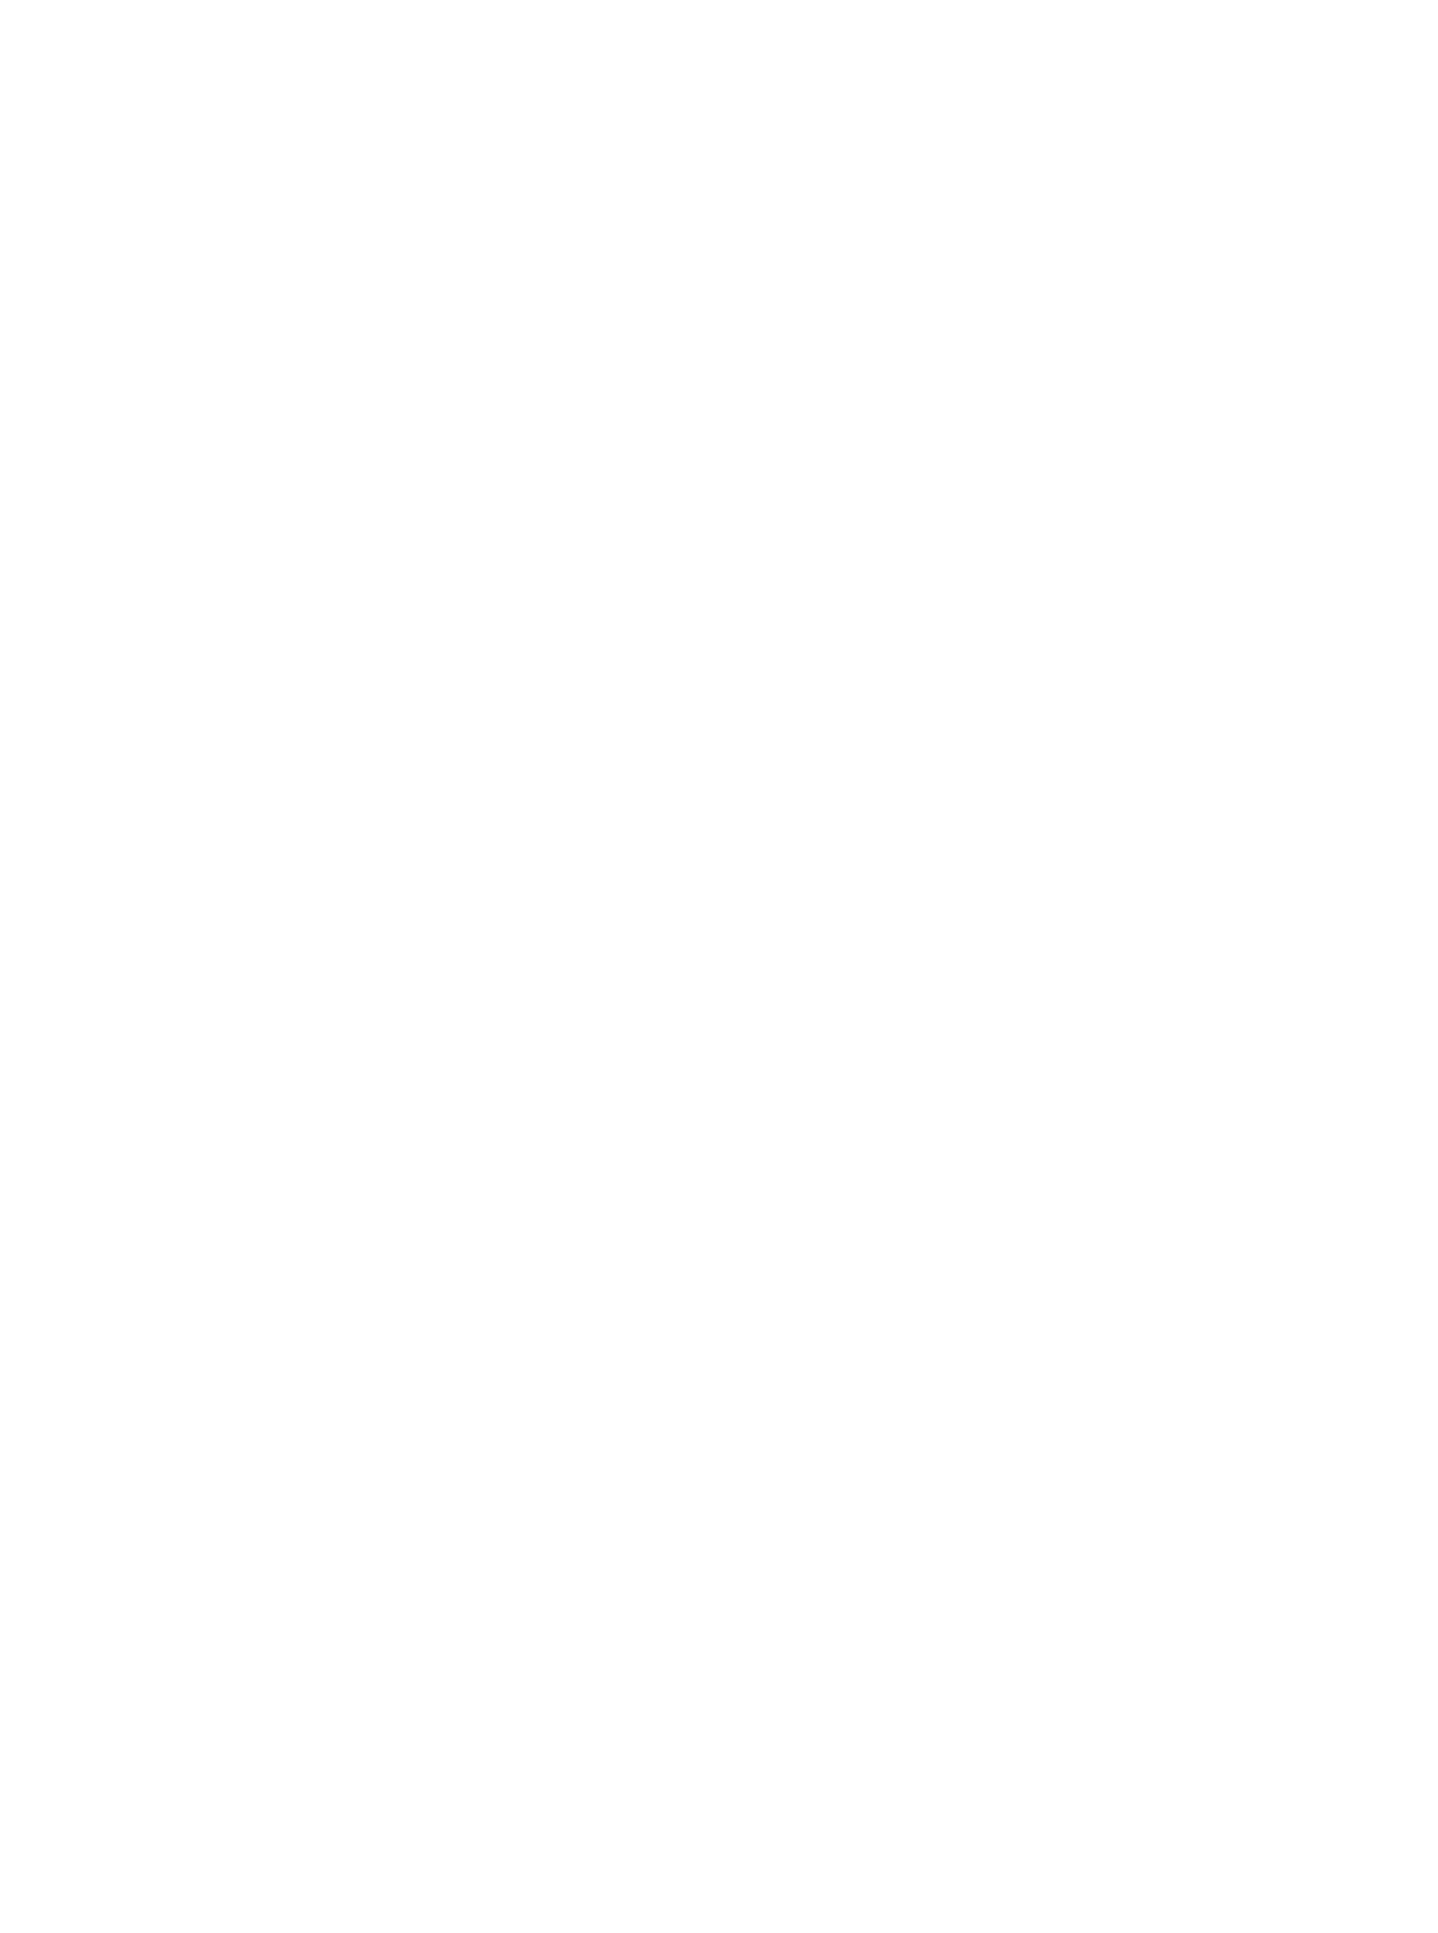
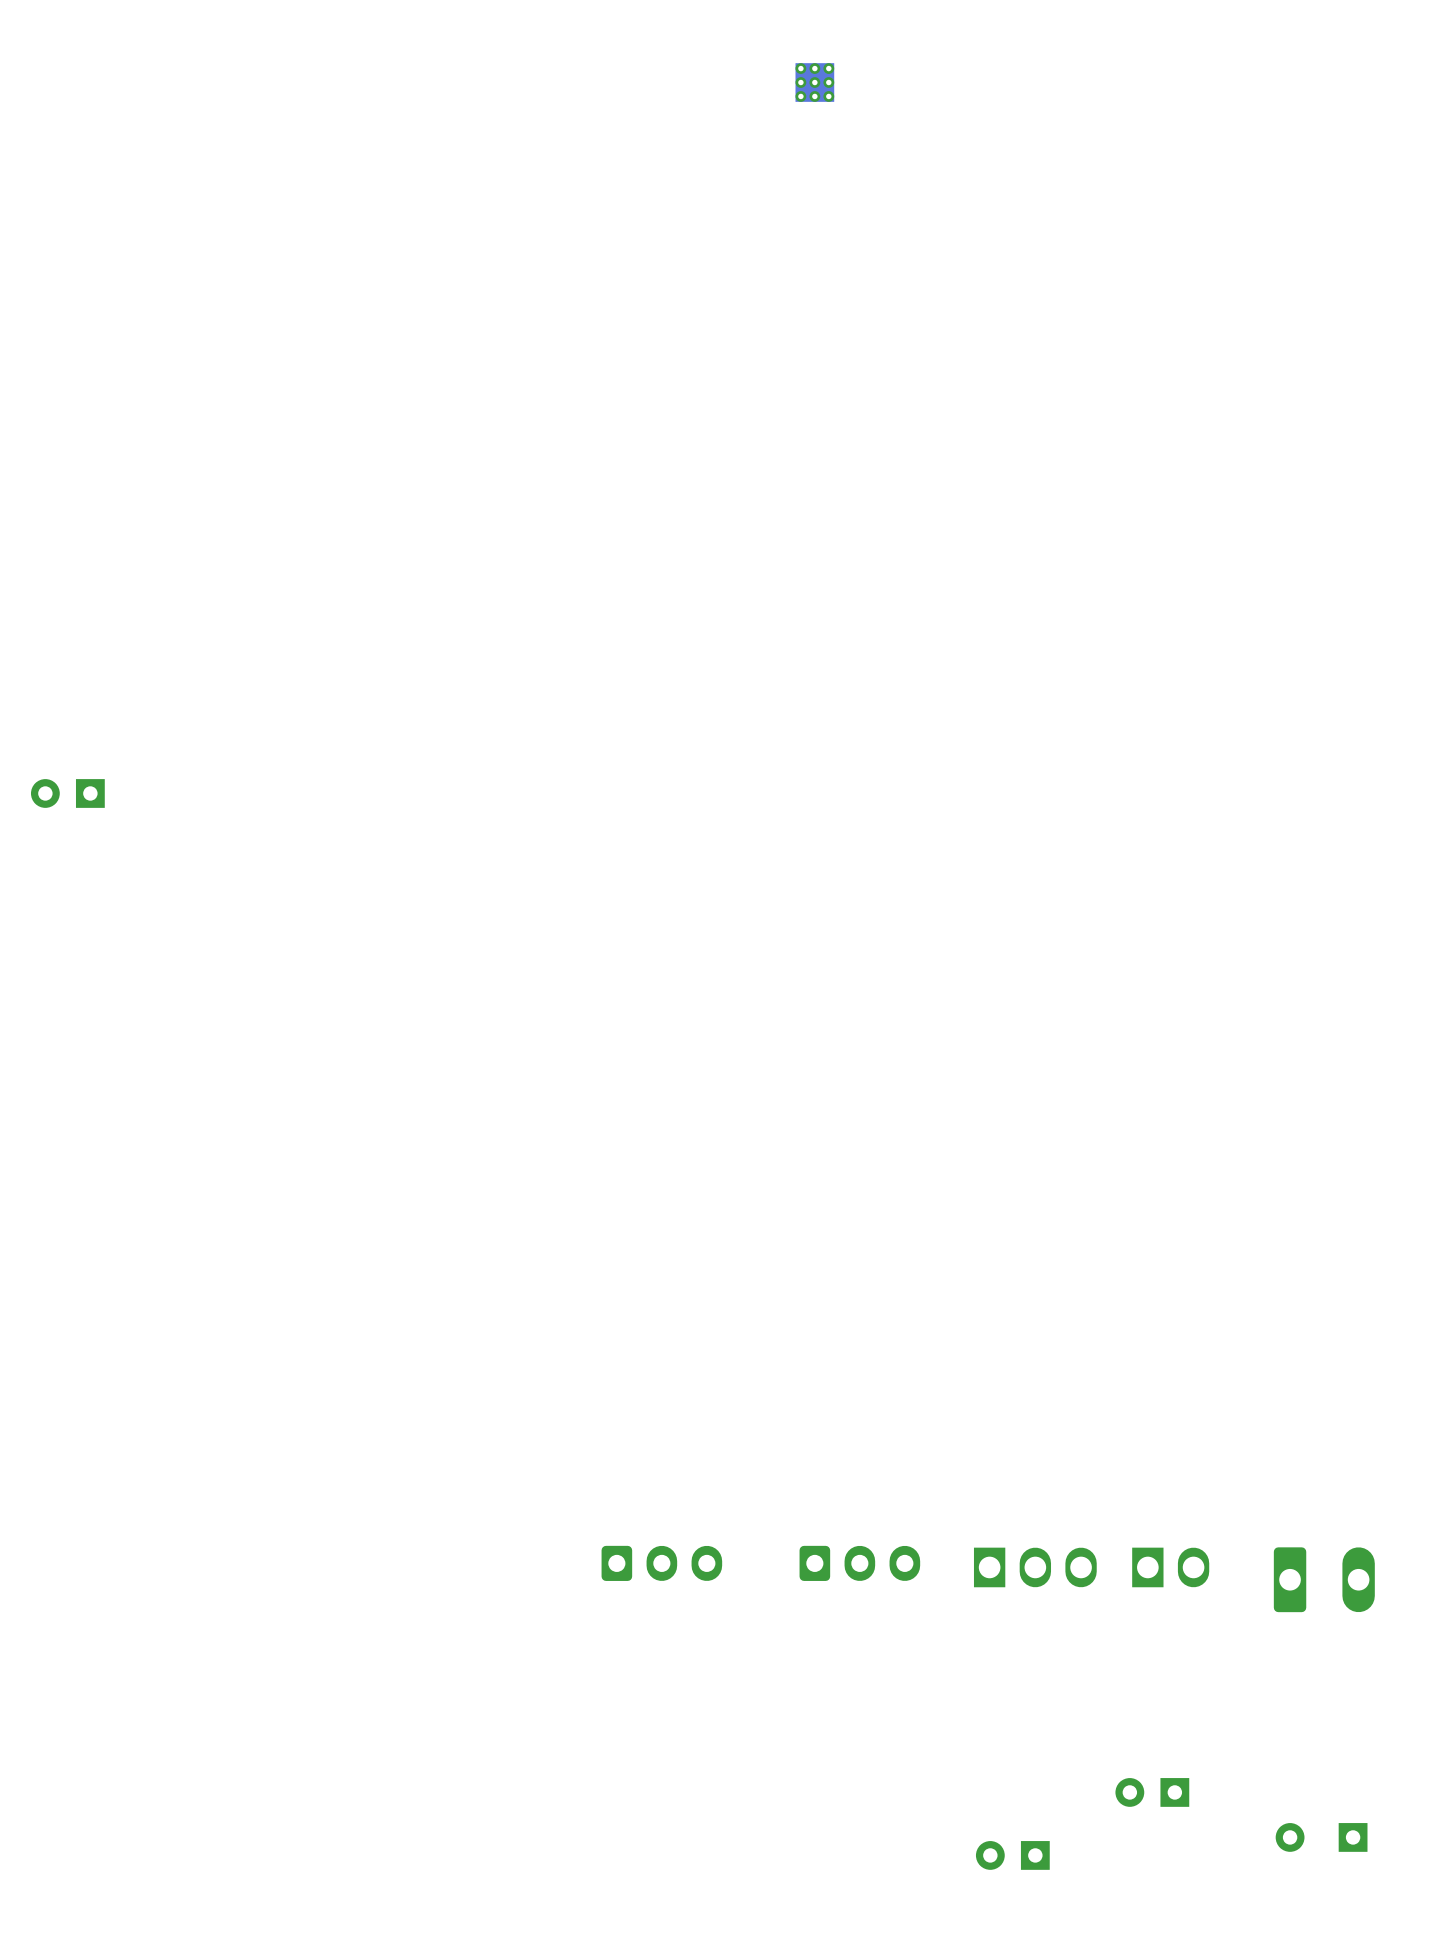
part: none -> (814, 82)
part: none -> (67, 793)
part: none -> (661, 1563)
part: none -> (859, 1563)
part: none -> (1035, 1567)
part: none -> (1170, 1567)
part: none -> (1324, 1579)
part: none -> (1152, 1792)
part: none -> (1321, 1837)
part: none -> (1012, 1855)

